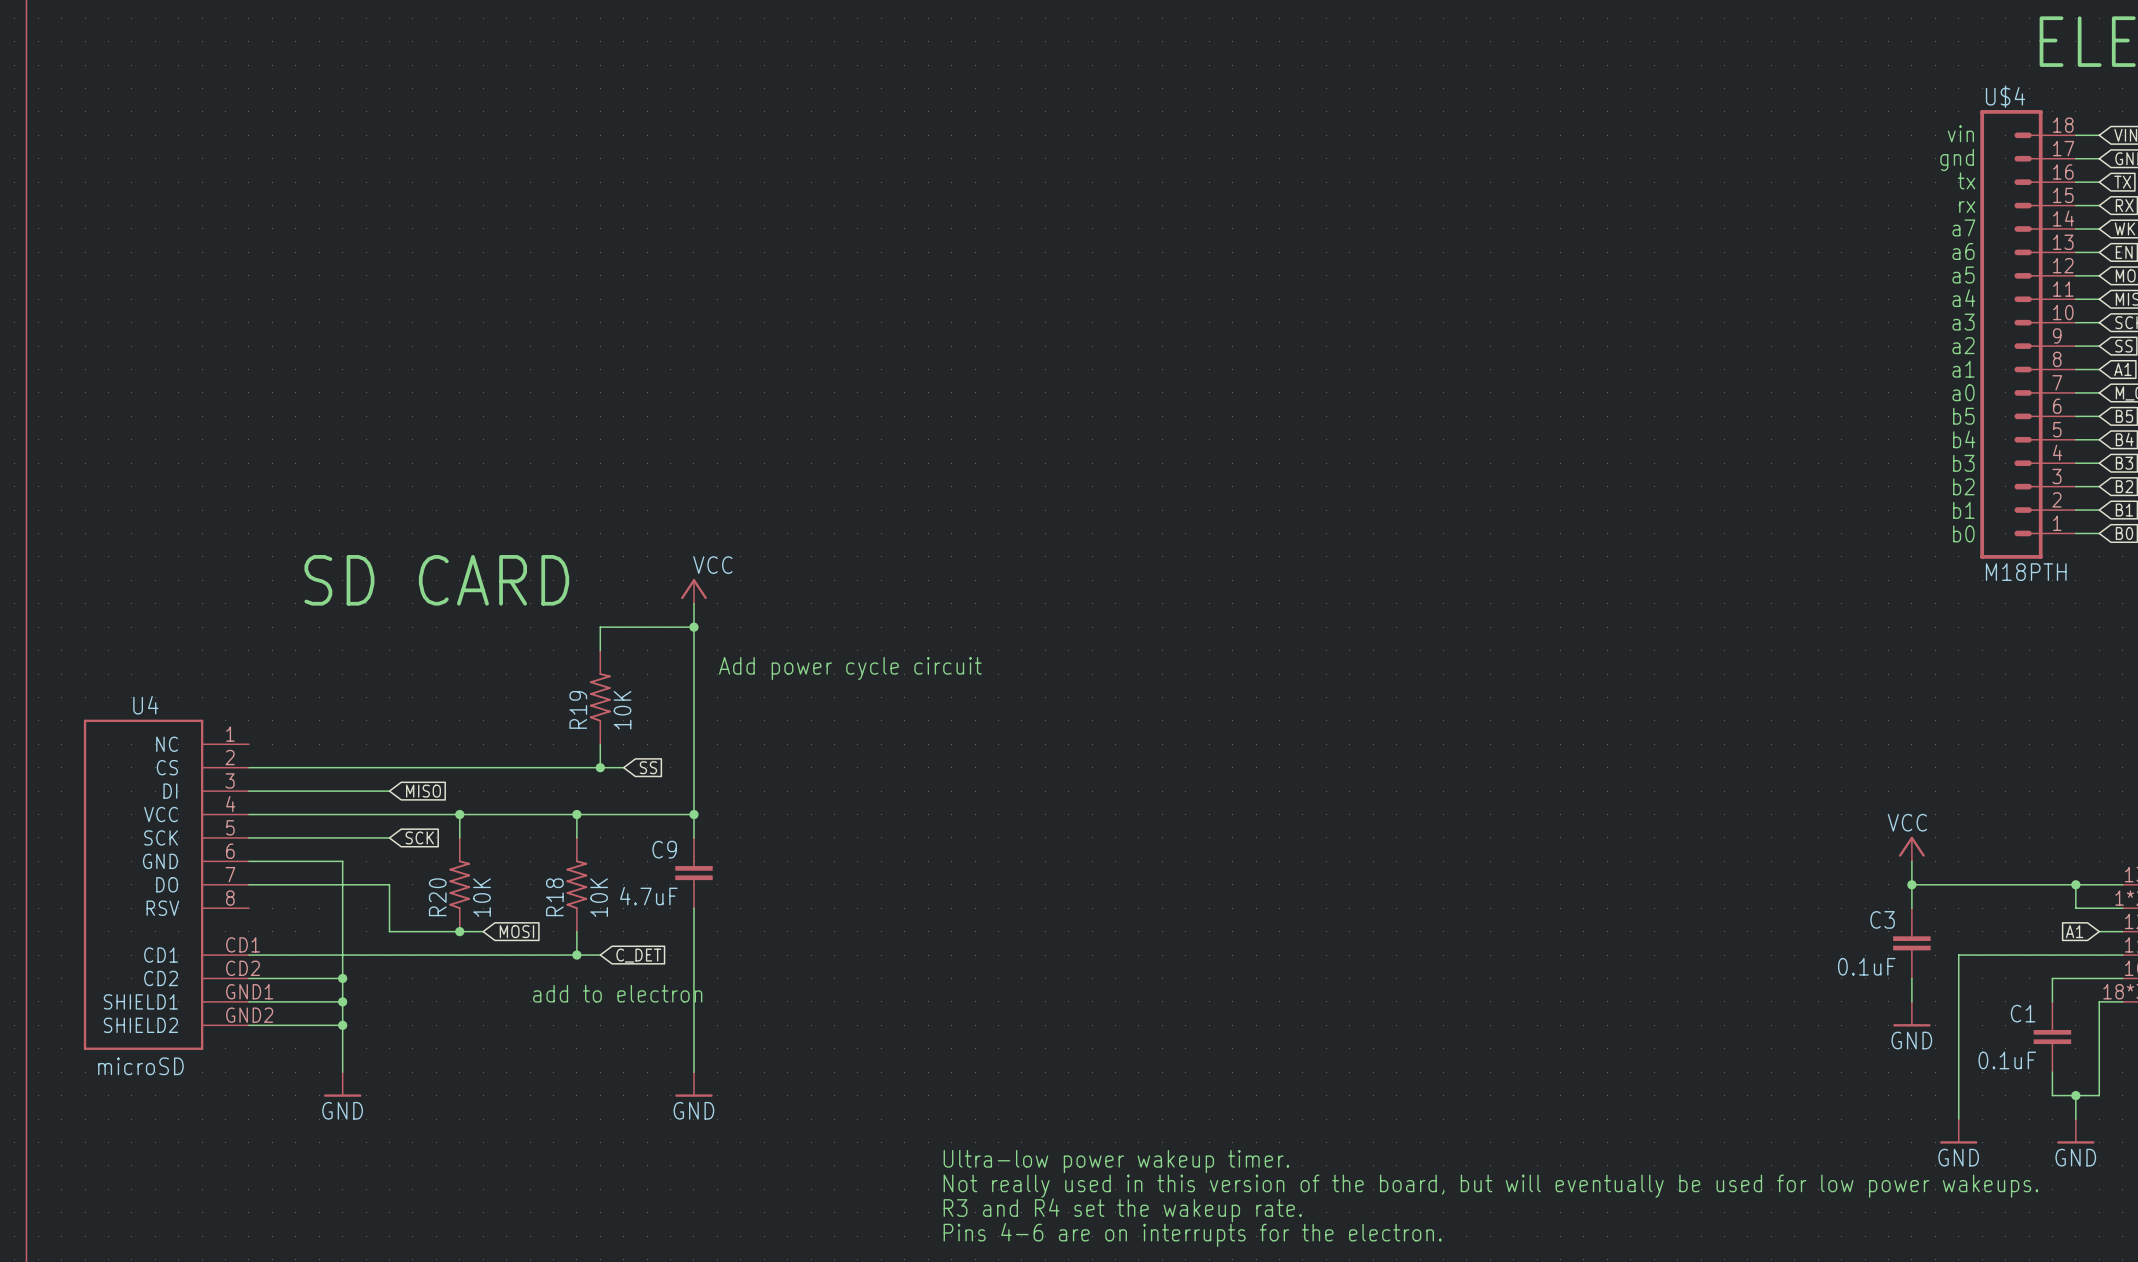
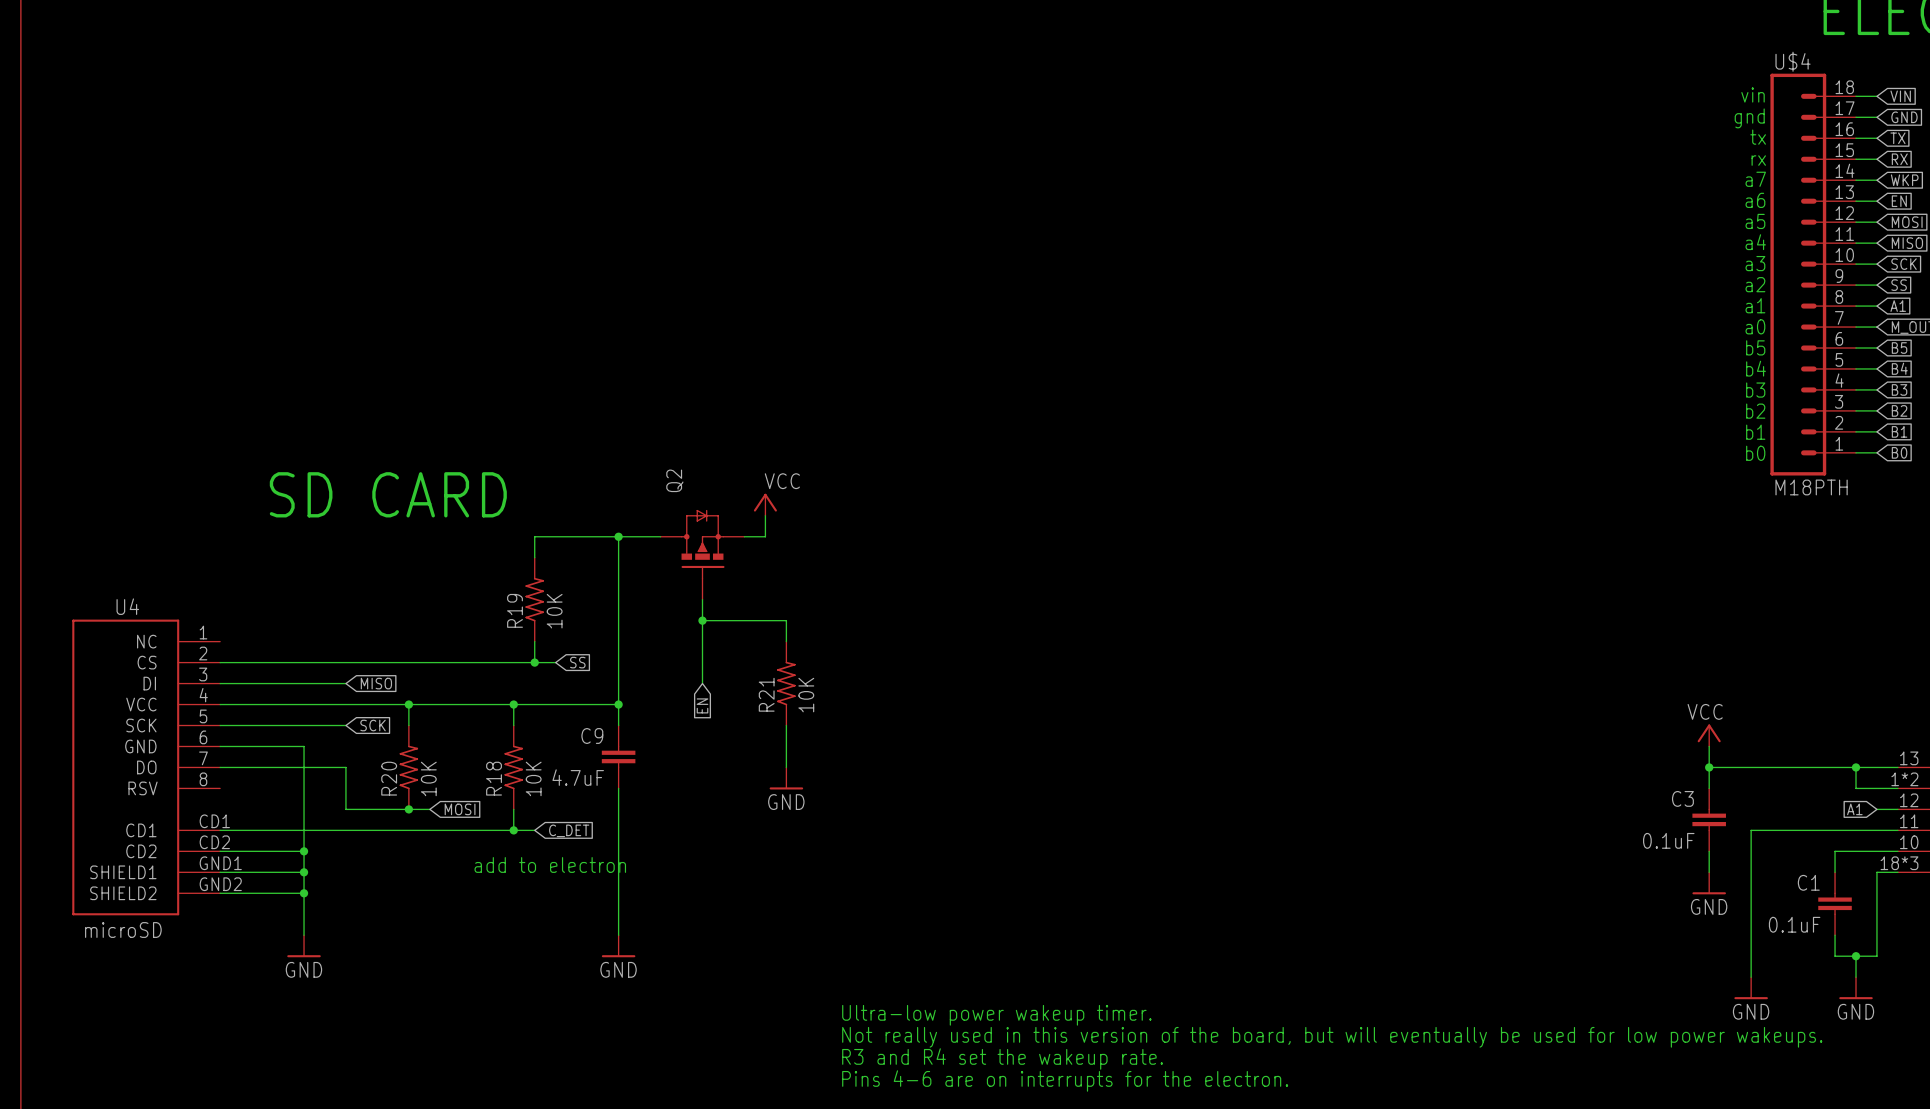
power symbol position: VCC (693, 591) -> VCC (765, 504)
wire: (693, 603) (693, 627) -> (660, 536) (618, 536)
wire: none -> (765, 515) (765, 536) (744, 536)
Q2: none -> (702, 554)
text: Add power cycle circuit (850, 668) -> none
wire: none -> (702, 599) (702, 683)
wire: none -> (702, 620) (786, 620) (786, 641)
junction: none -> (702, 620)
R21: none -> 10K (786, 683)
global label: none -> EN (702, 705)
wire: none -> (786, 725) (786, 767)
power symbol: none -> GND (786, 778)

